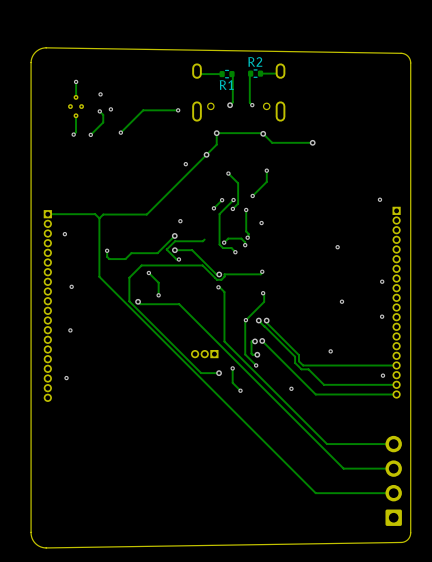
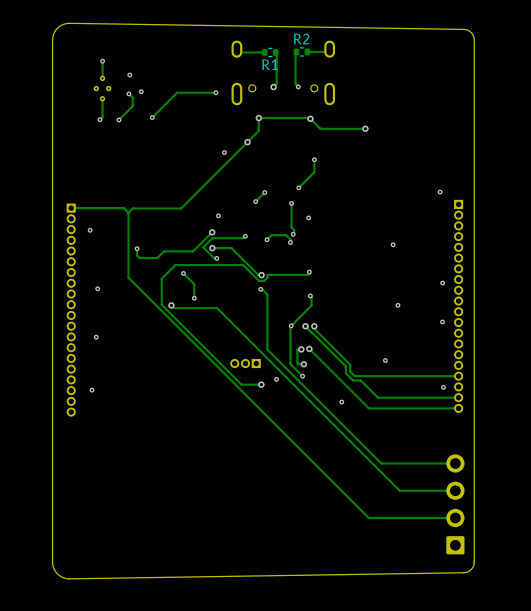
track: (228, 173) (238, 183) (238, 203) (232, 208) -> none
via: (228, 173) -> none
track: (233, 200) (219, 214) (219, 244) (223, 248) (231, 248) (235, 252) -> none
via: (233, 200) -> none
via: (232, 208) -> none
via: none -> (245, 236)
via: (235, 252) -> none
track: (232, 368) (232, 382) (240, 390) -> none
via: (240, 390) -> none

